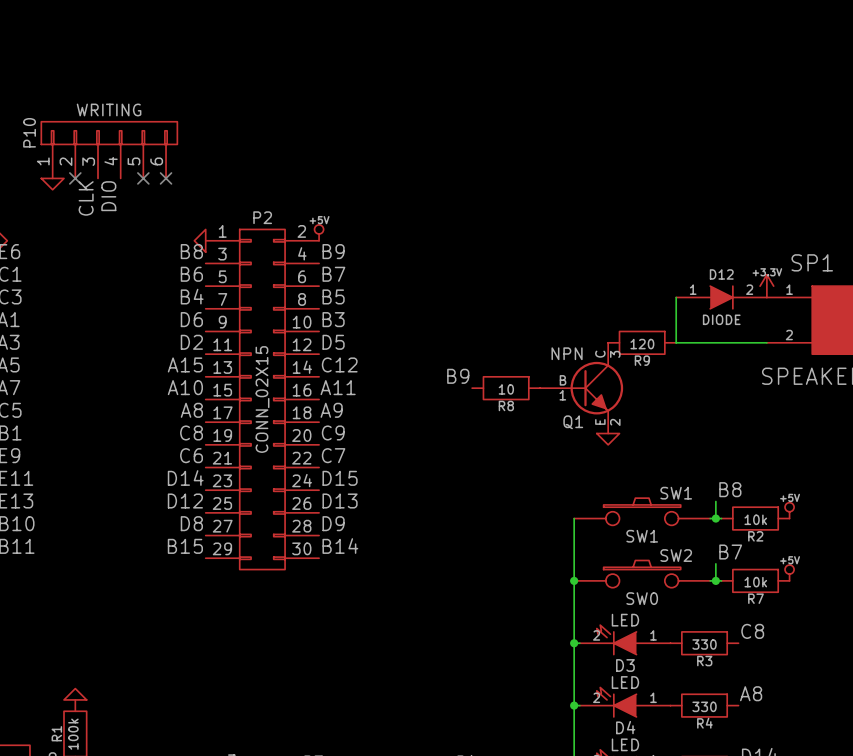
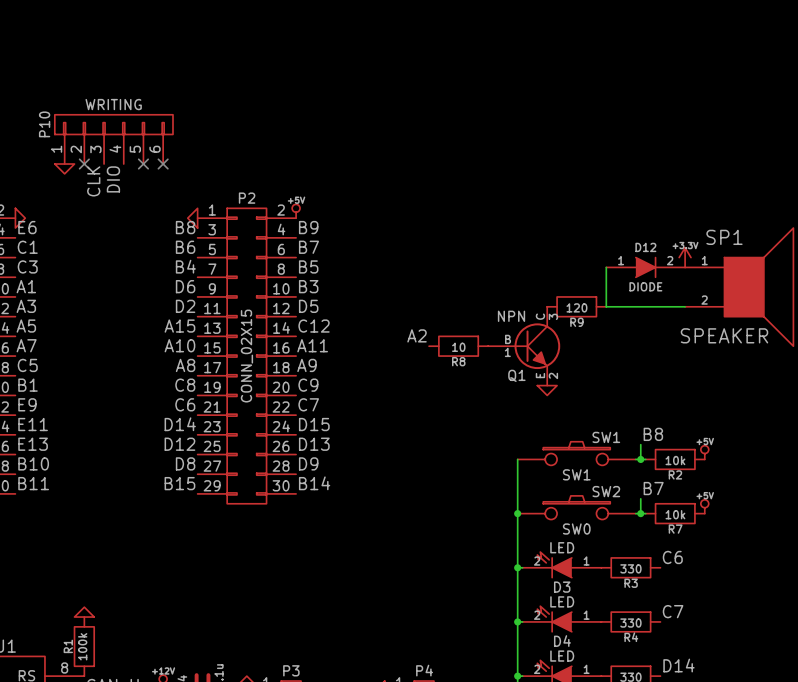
label: B9 (458, 376) -> A2 (417, 335)
label: C8 (752, 631) -> C6 (672, 557)
label: A8 (751, 693) -> C7 (673, 611)

